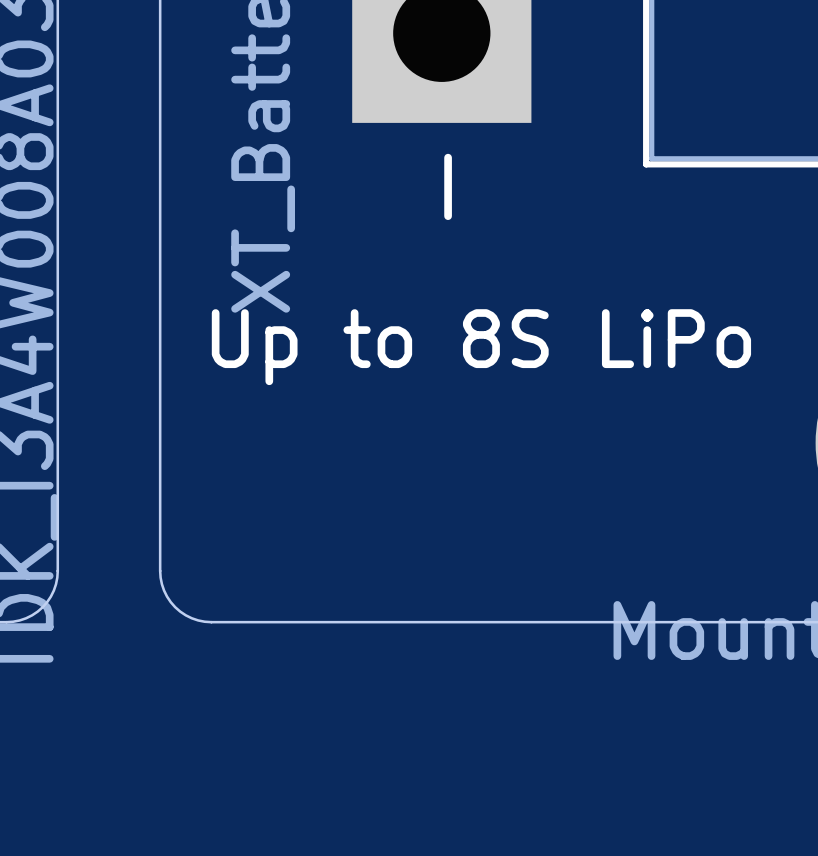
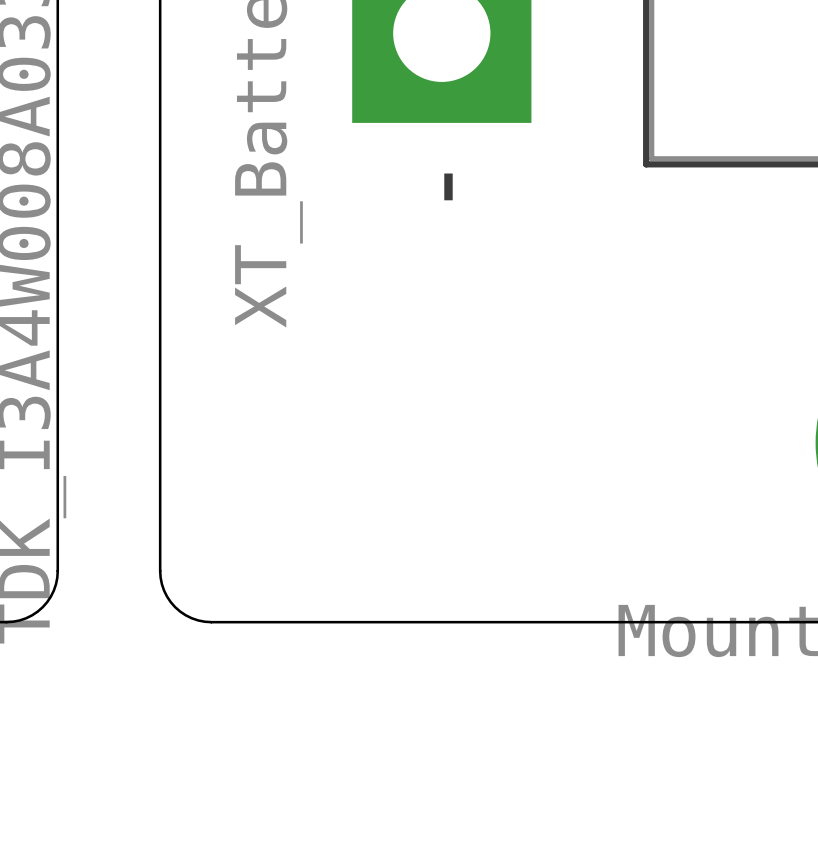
text: Up to 8S LiPo (481, 347) -> none

